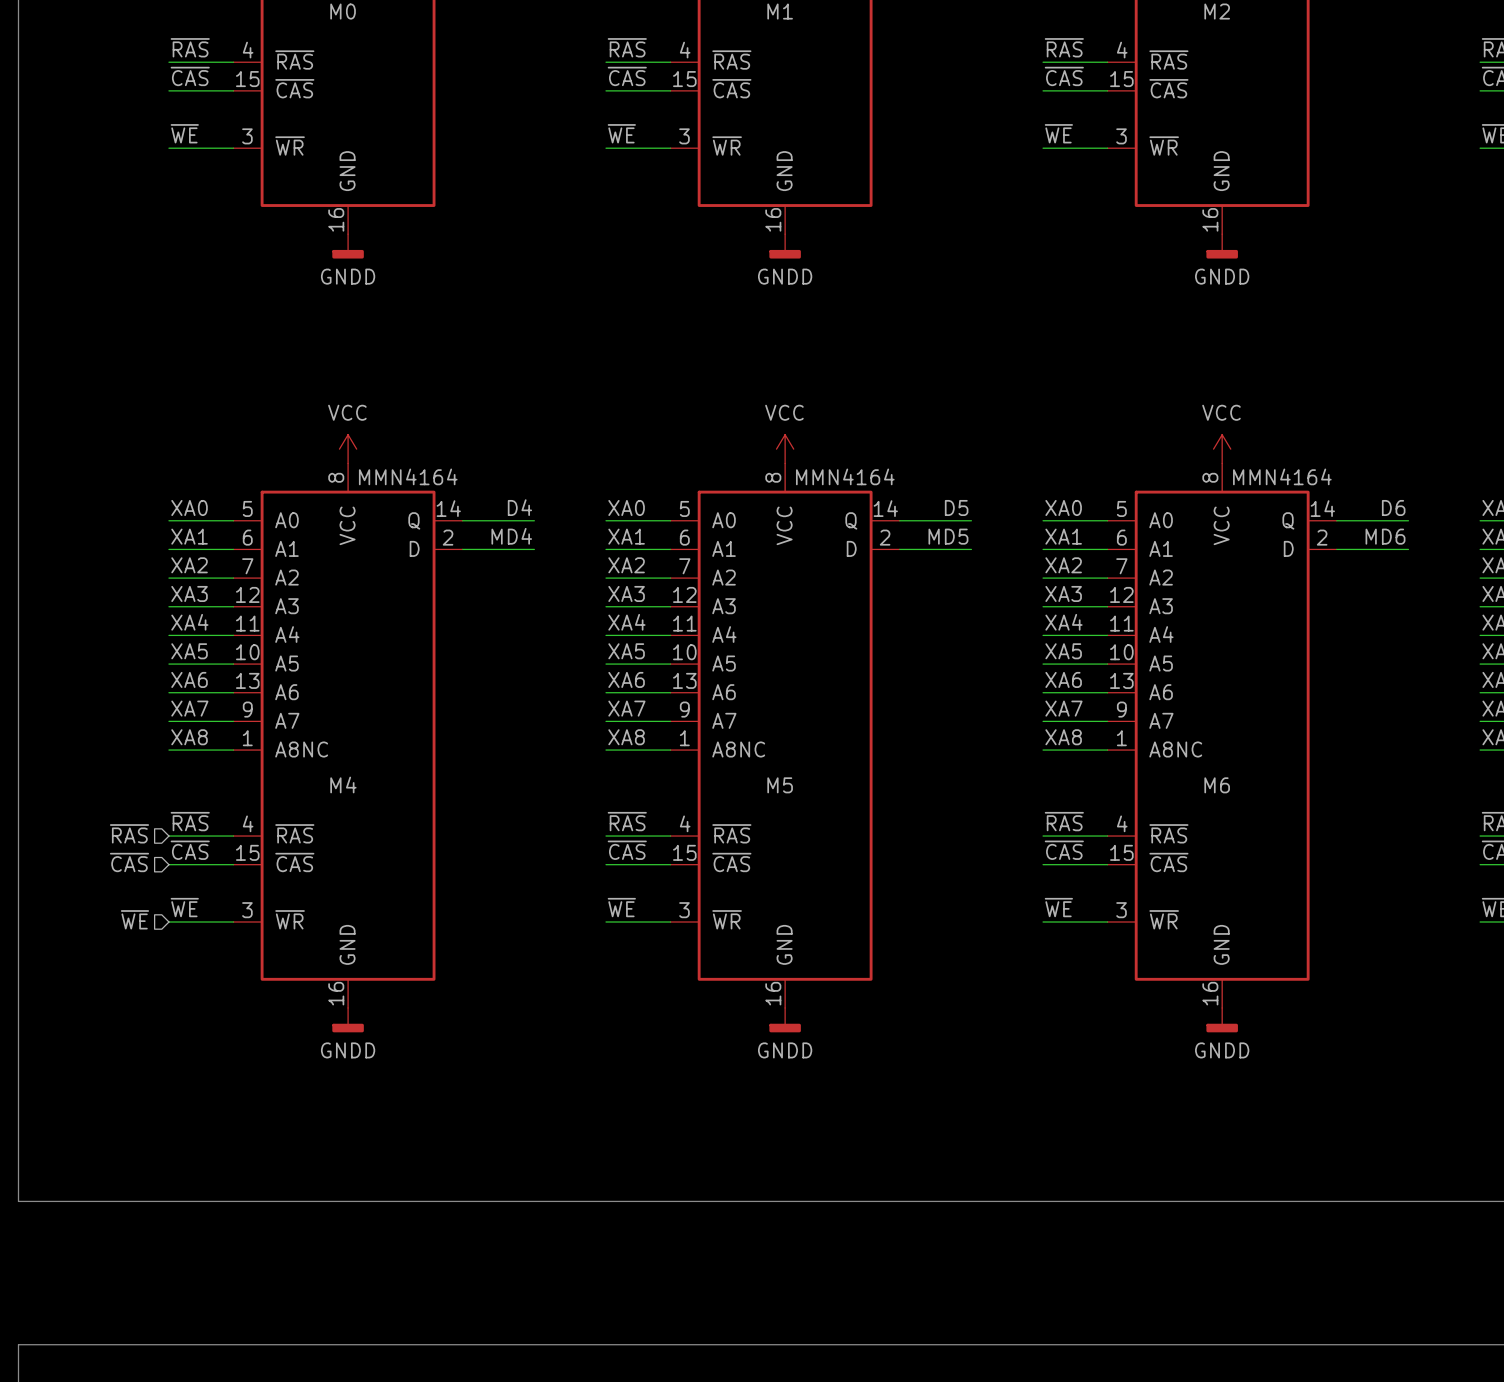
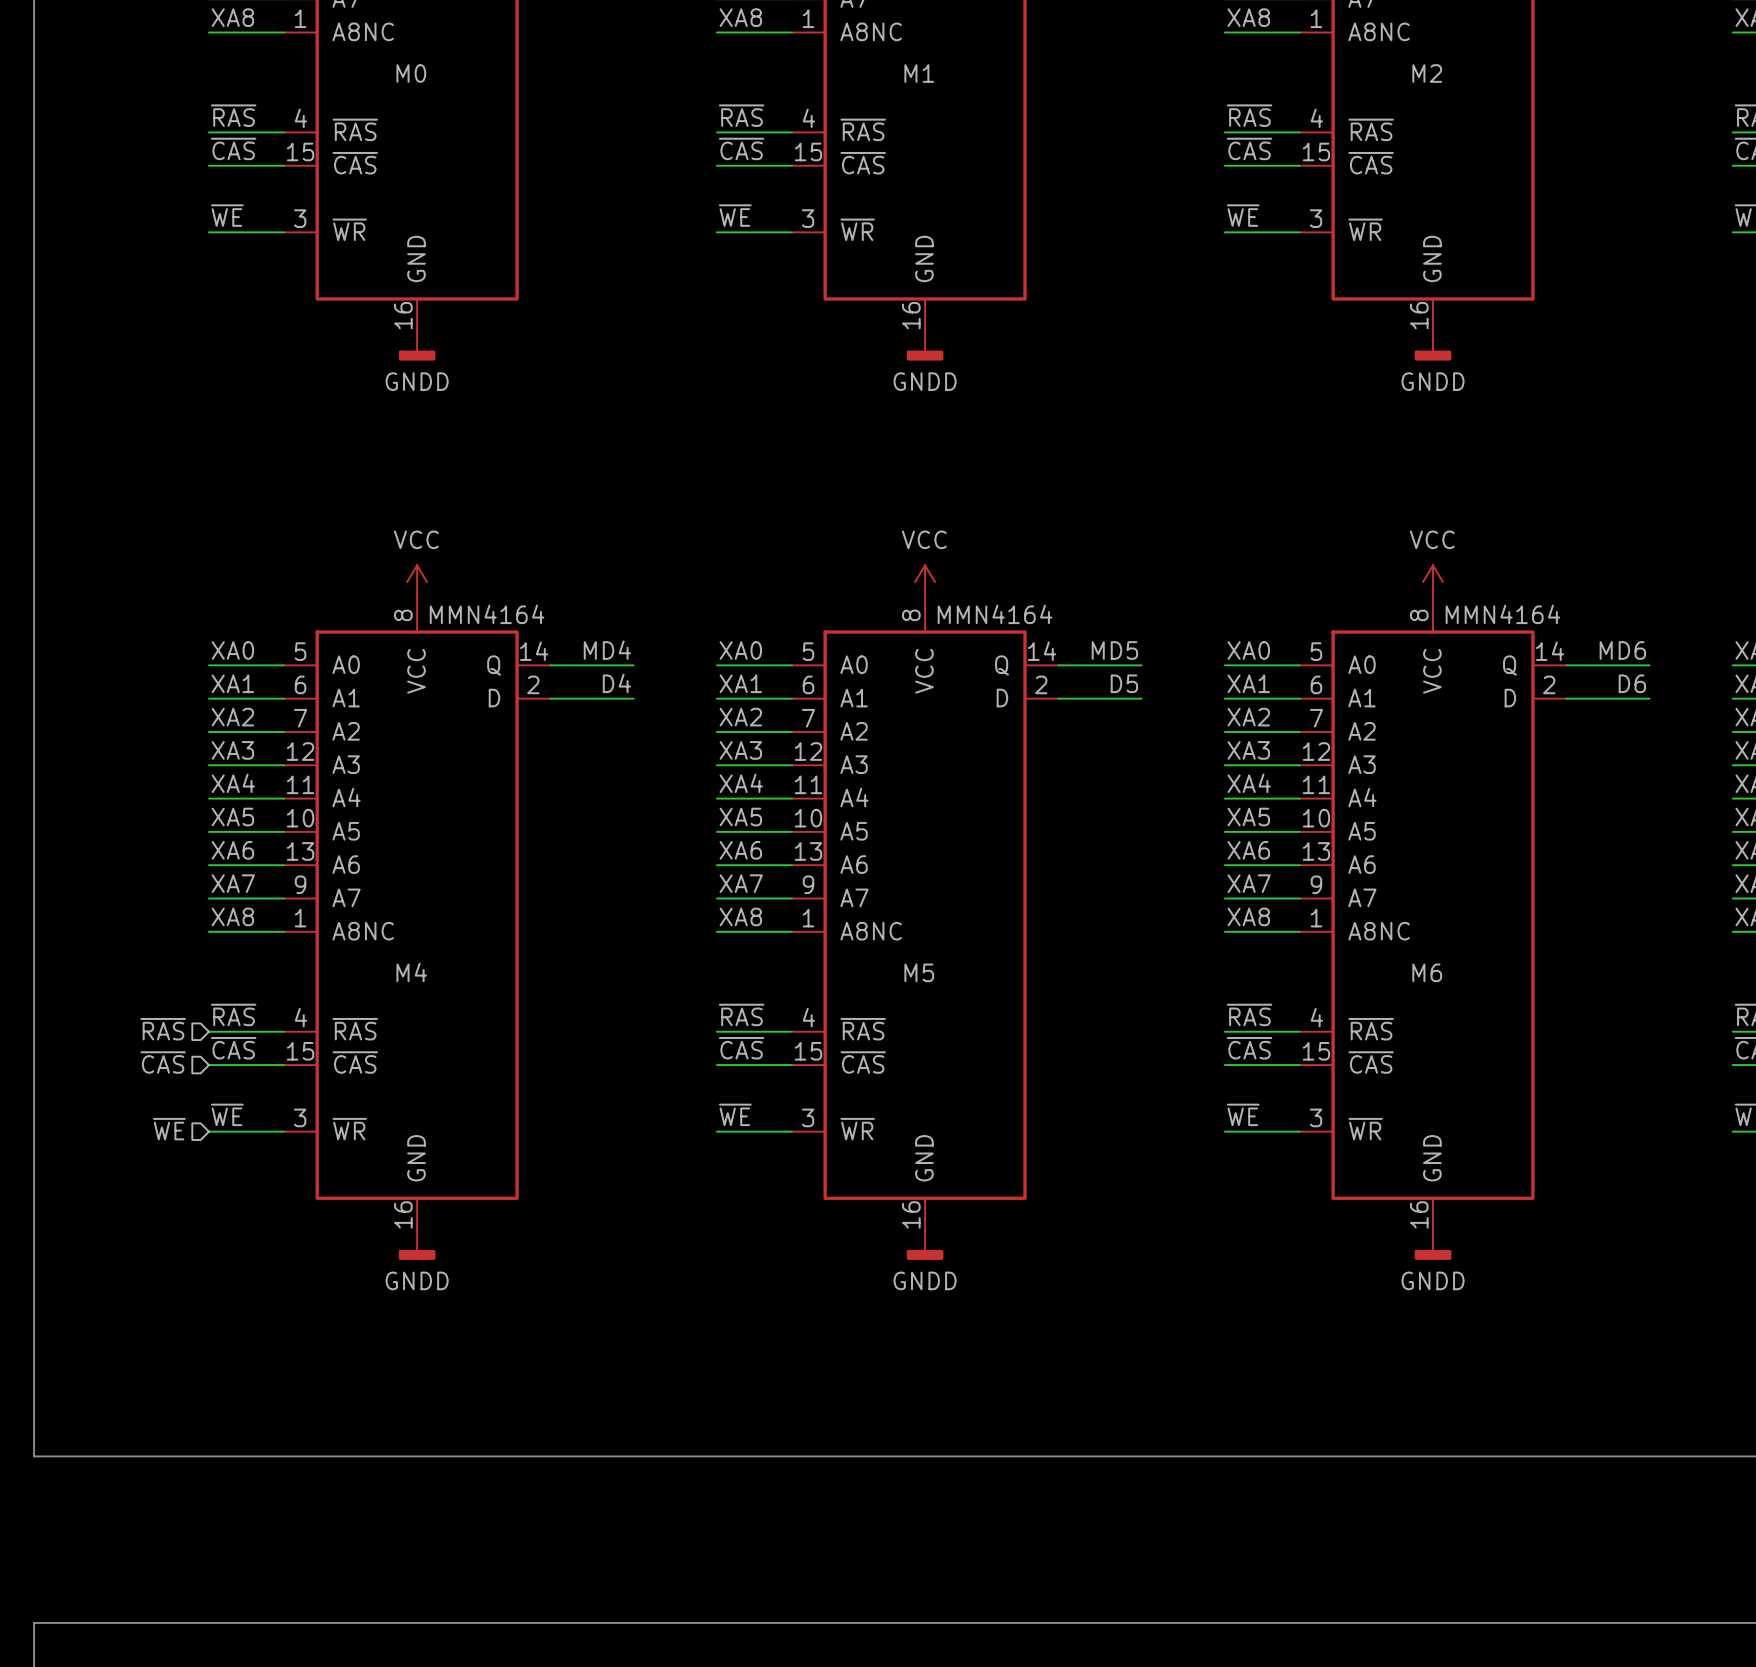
label: D4 (519, 507) -> MD4 (607, 650)
label: D5 (956, 507) -> MD5 (1114, 650)
label: D6 (1393, 507) -> MD6 (1622, 650)
label: MD4 (511, 536) -> D4 (616, 683)
label: MD5 (948, 536) -> D5 (1124, 683)
label: MD6 (1385, 536) -> D6 (1632, 683)

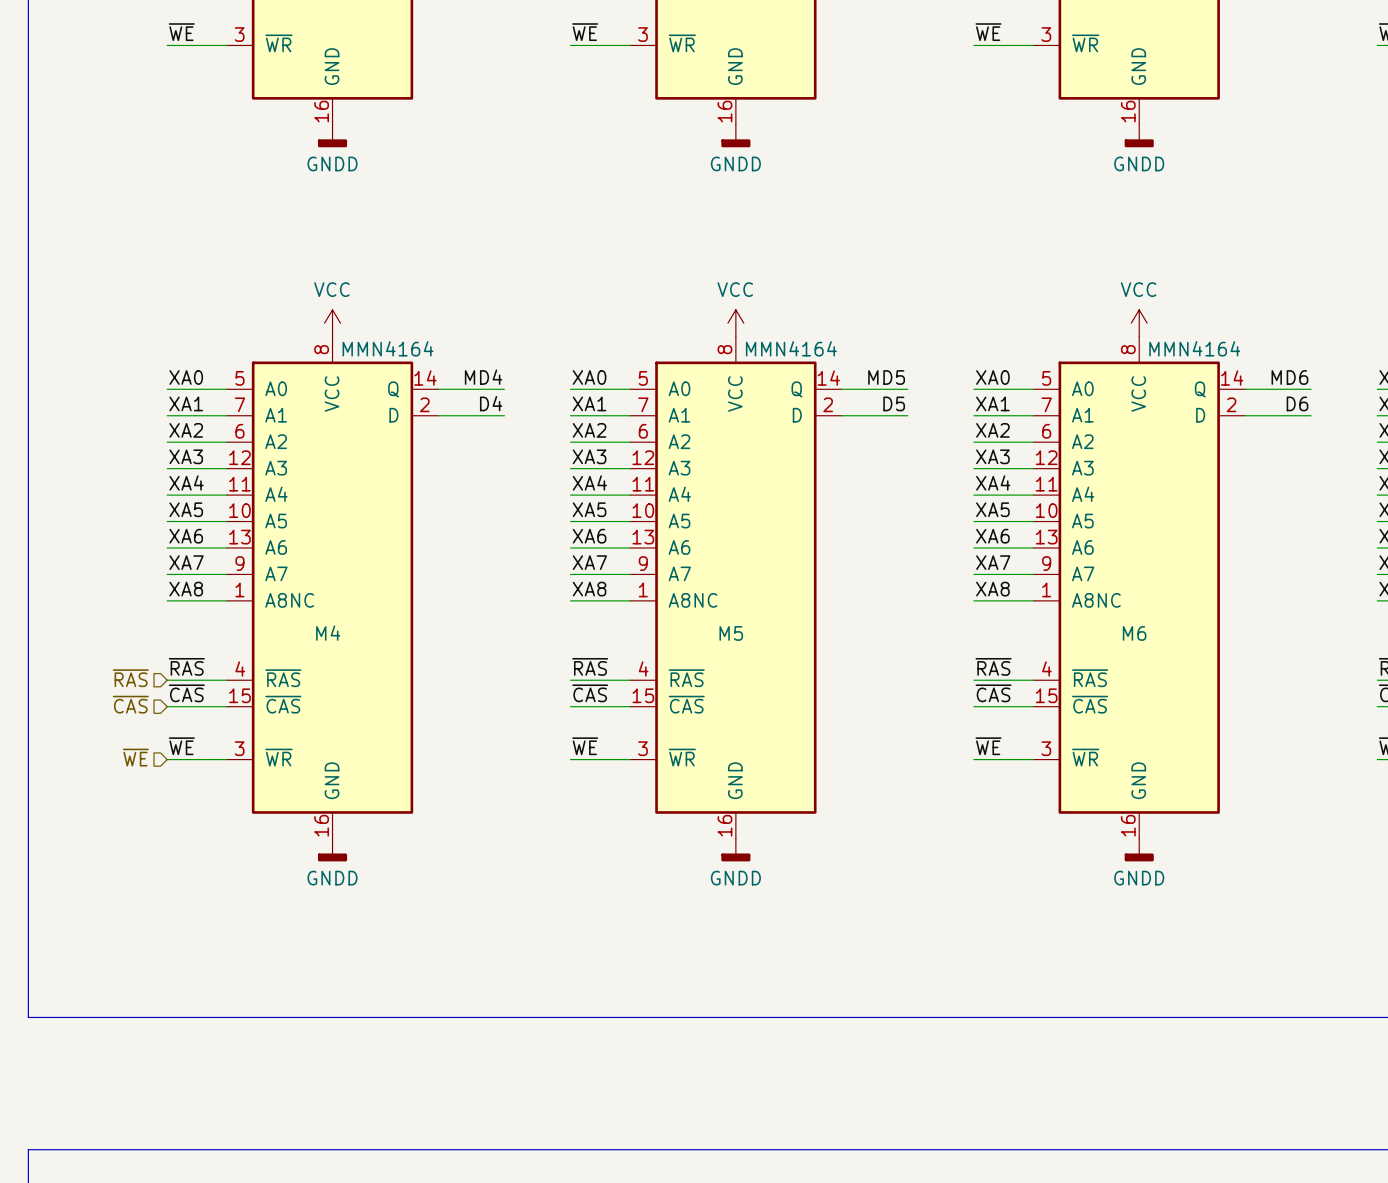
M4 pin number: 6 (300, 684) -> 7 (239, 404)
M5 pin number: 6 (808, 684) -> 7 (643, 404)
M6 pin number: 6 (1316, 684) -> 7 (1046, 404)
M4 pin number: 7 (300, 718) -> 6 (239, 431)
M5 pin number: 7 (808, 718) -> 6 (643, 431)
M6 pin number: 7 (1316, 718) -> 6 (1046, 431)

